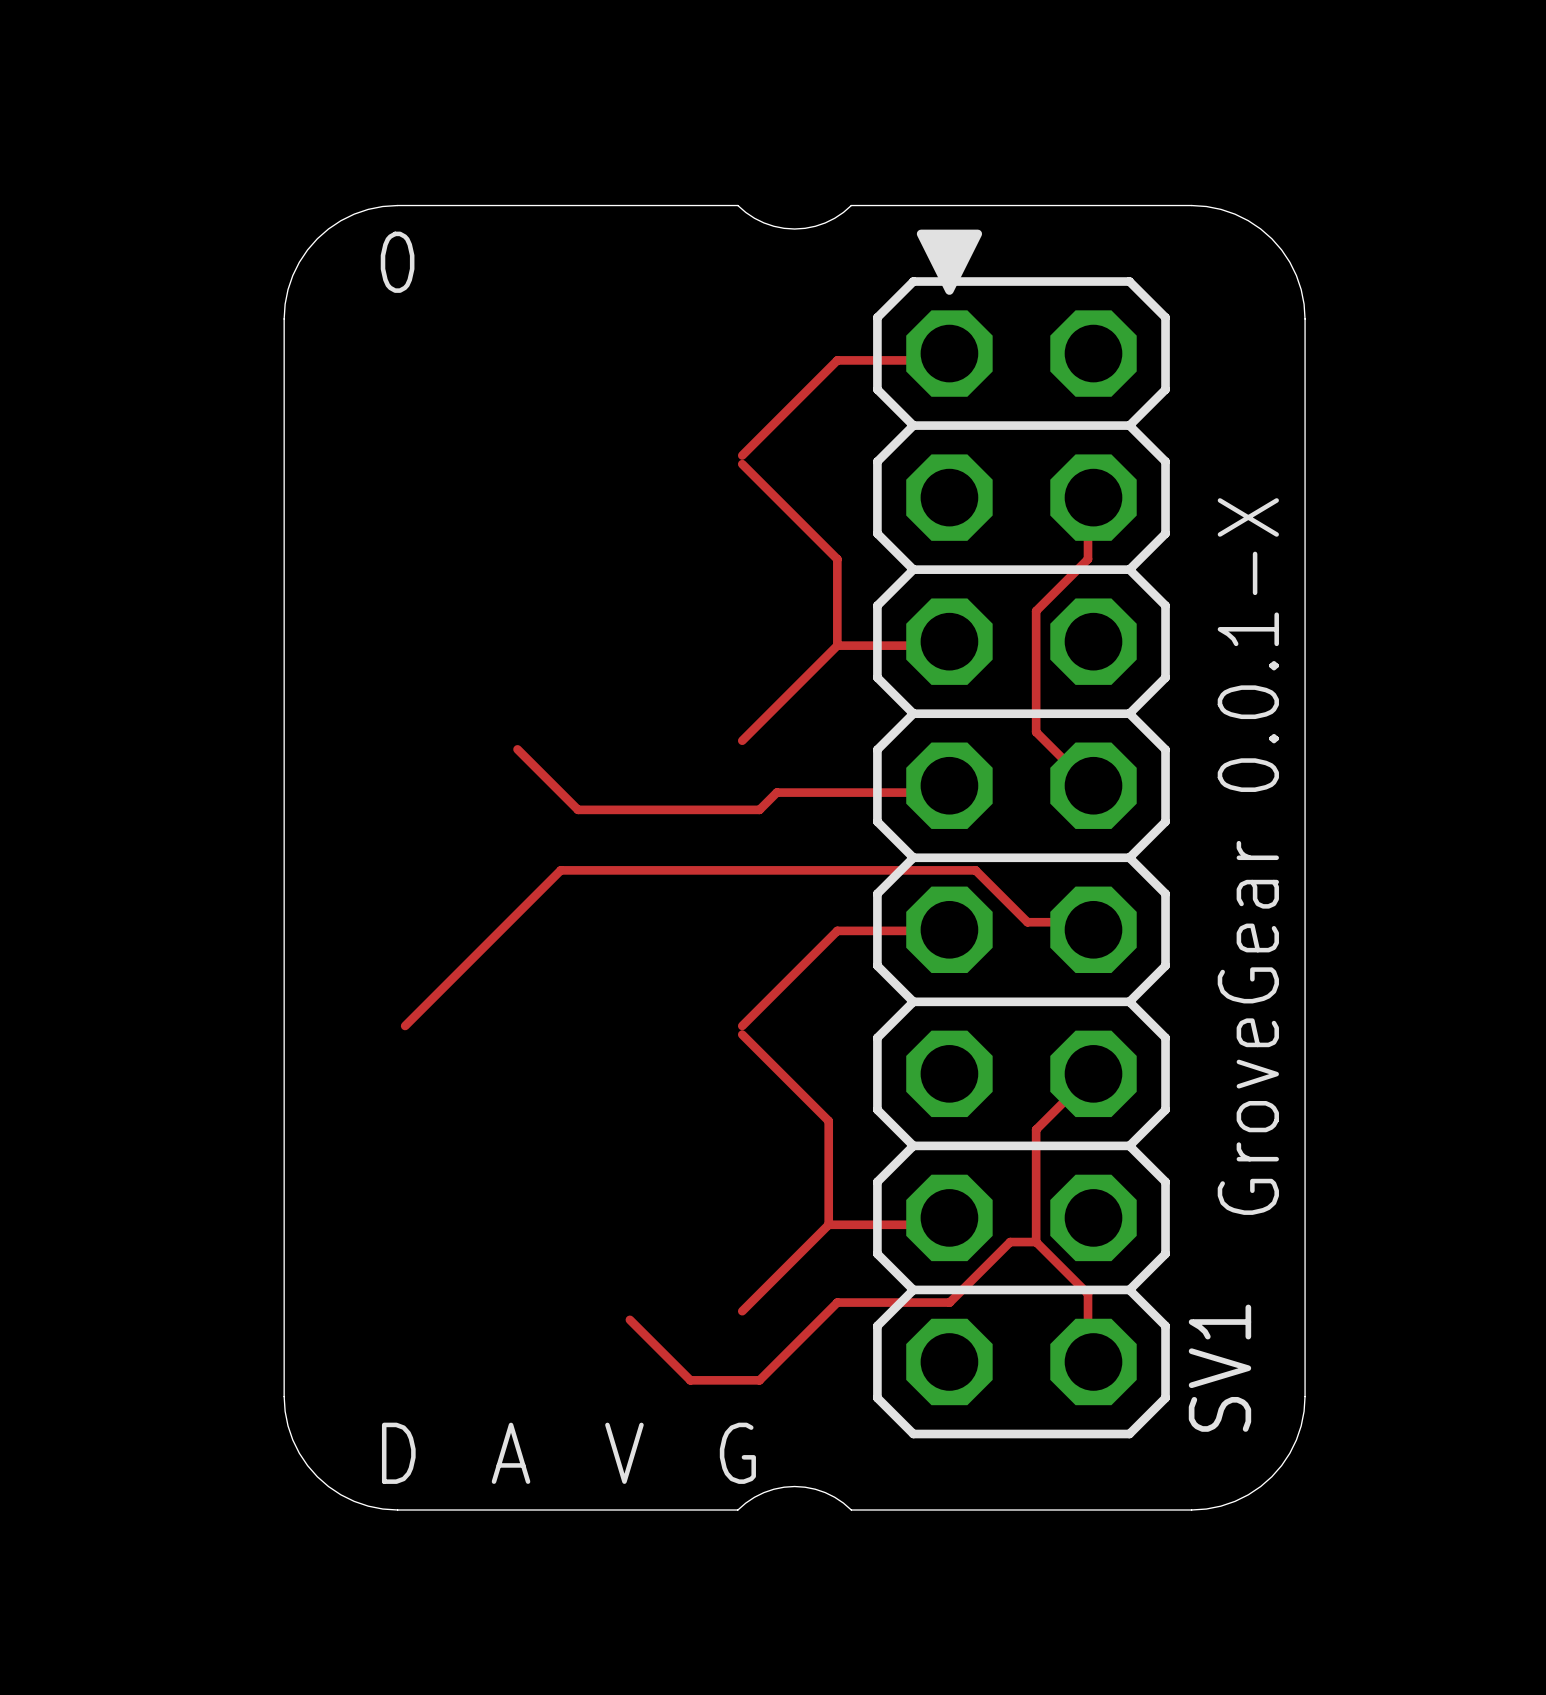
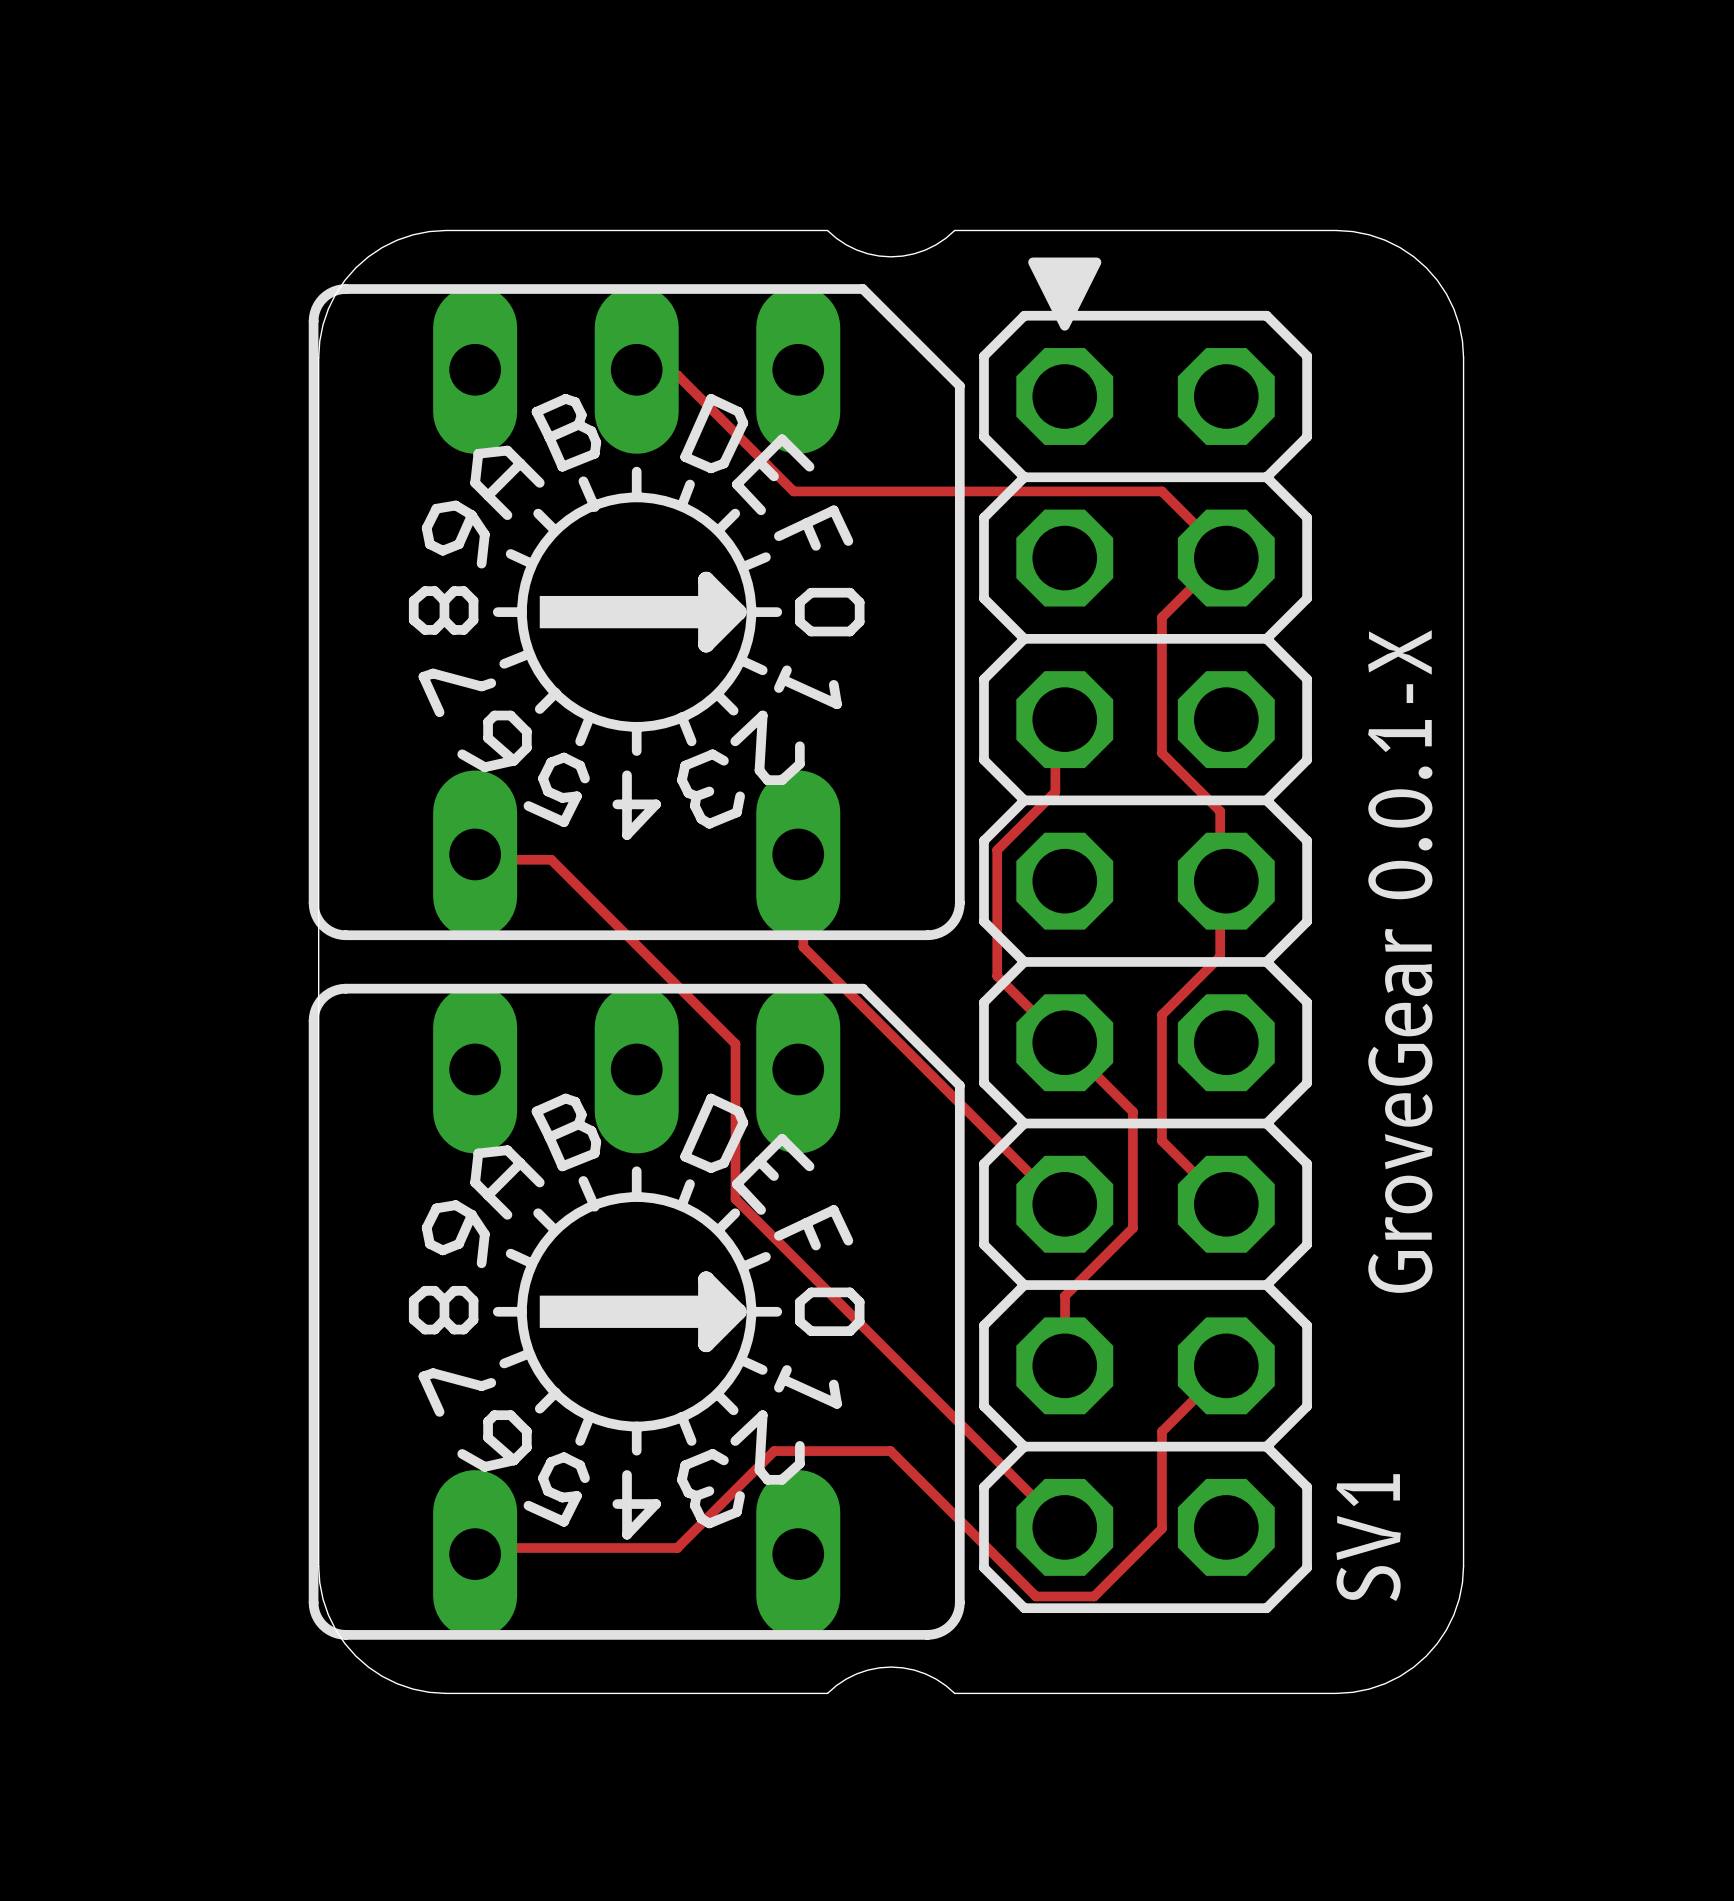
text: 0 (397, 262) -> none
track: none -> (636, 369) (638, 375) (677, 375) (793, 491) (1162, 491) (1226, 558)
track: (949, 353) (941, 360) (837, 360) (742, 455) -> none
track: (742, 464) (837, 559) (837, 645) -> none
track: (1088, 498) (1088, 559) (1036, 611) -> (1220, 559) (1162, 617) (1162, 685)
part: none -> (636, 612)
track: (837, 645) (941, 645) -> (1064, 1042) (997, 976) (997, 850) (1055, 791) (1055, 724)
track: (837, 645) (742, 740) -> none
track: (1036, 671) (1036, 732) (1088, 783) -> (1162, 753) (1220, 811) (1220, 879)
track: (517, 749) (578, 809) (759, 809) (776, 792) (941, 792) (949, 785) -> none
track: none -> (475, 854) (483, 859) (551, 859) (735, 1043) (735, 1199) (1064, 1527)
track: none -> (798, 854) (803, 859) (803, 947) (1055, 1199) (1064, 1204)
track: (949, 929) (837, 930) (742, 1025) -> (1065, 1043) (1132, 1111) (1132, 1228) (1065, 1295) (1064, 1365)
track: (1093, 929) (1088, 922) (1027, 922) (975, 870) (560, 870) (405, 1025) -> none
track: (742, 1034) (828, 1121) (828, 1224) -> none
track: (1093, 1073) (1036, 1129) (1036, 1242) -> (1226, 1204) (1162, 1140) (1162, 1014) (1220, 956) (1220, 888) (1226, 881)
part: none -> (636, 1311)
track: (949, 1217) (941, 1224) (828, 1224) -> none
track: none -> (1226, 1365) (1162, 1431) (1162, 1528) (1094, 1596) (1035, 1596) (890, 1451) (774, 1451) (677, 1548) (483, 1548) (475, 1554)
track: (828, 1224) (742, 1311) -> none
track: (1036, 1242) (1088, 1293) (1088, 1354) (1093, 1361) -> none
track: (1036, 1242) (1010, 1242) (949, 1302) (837, 1302) (759, 1380) (690, 1380) (629, 1319) -> none
text: D (398, 1453) -> none
text: A (511, 1453) -> none
text: V (624, 1453) -> none
text: G (737, 1453) -> none

